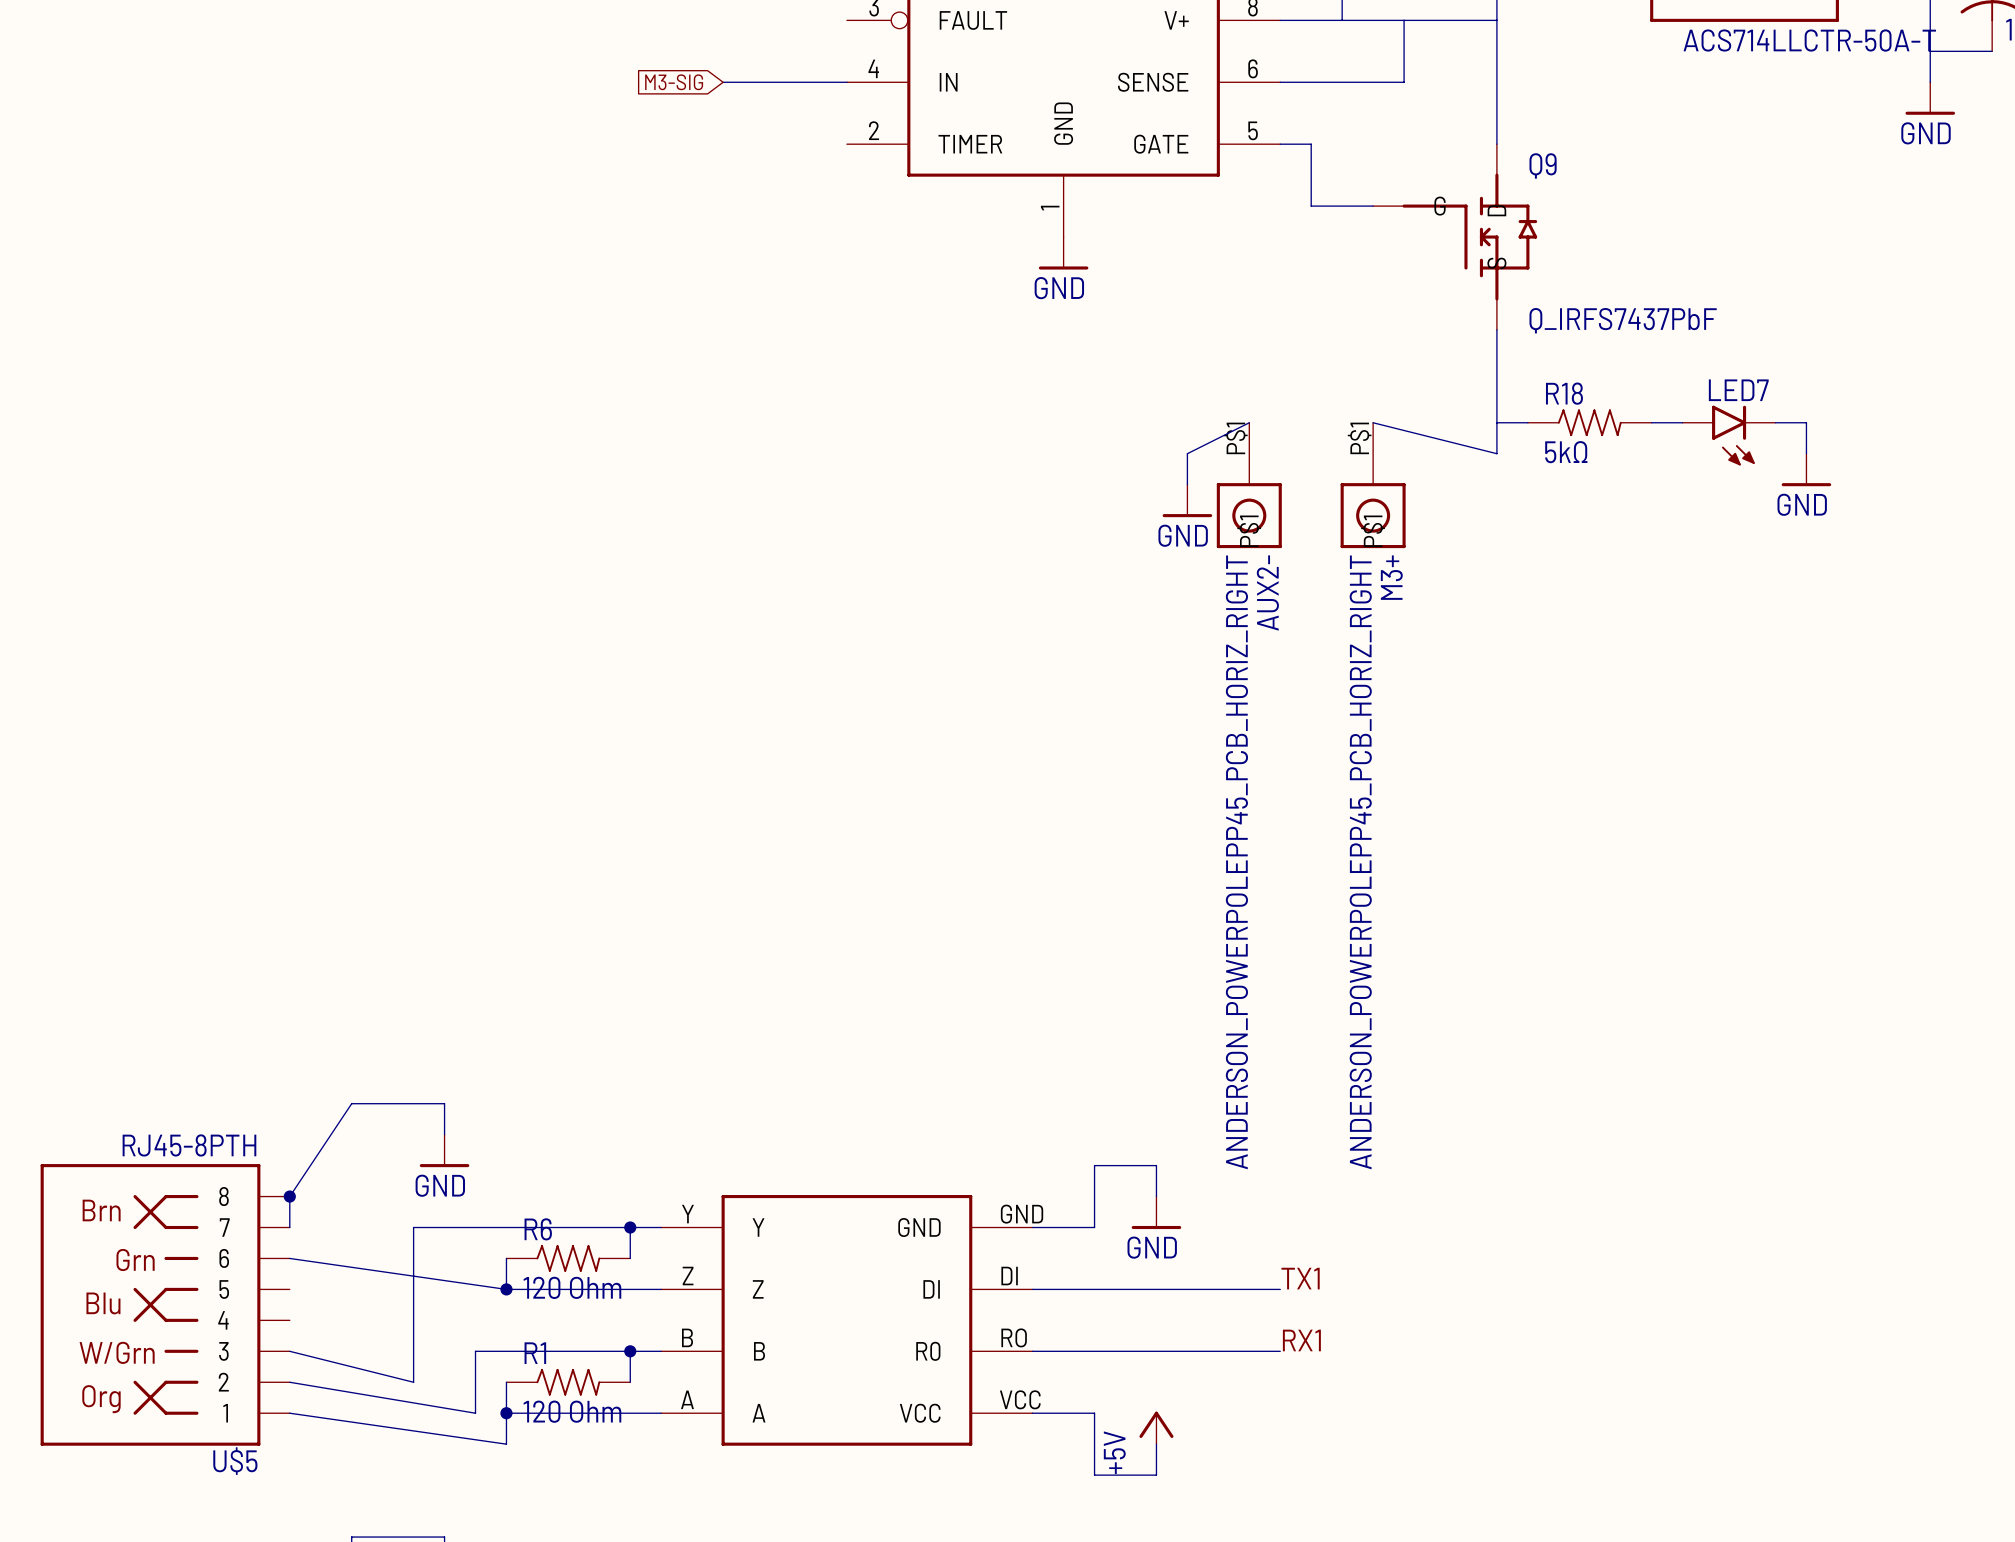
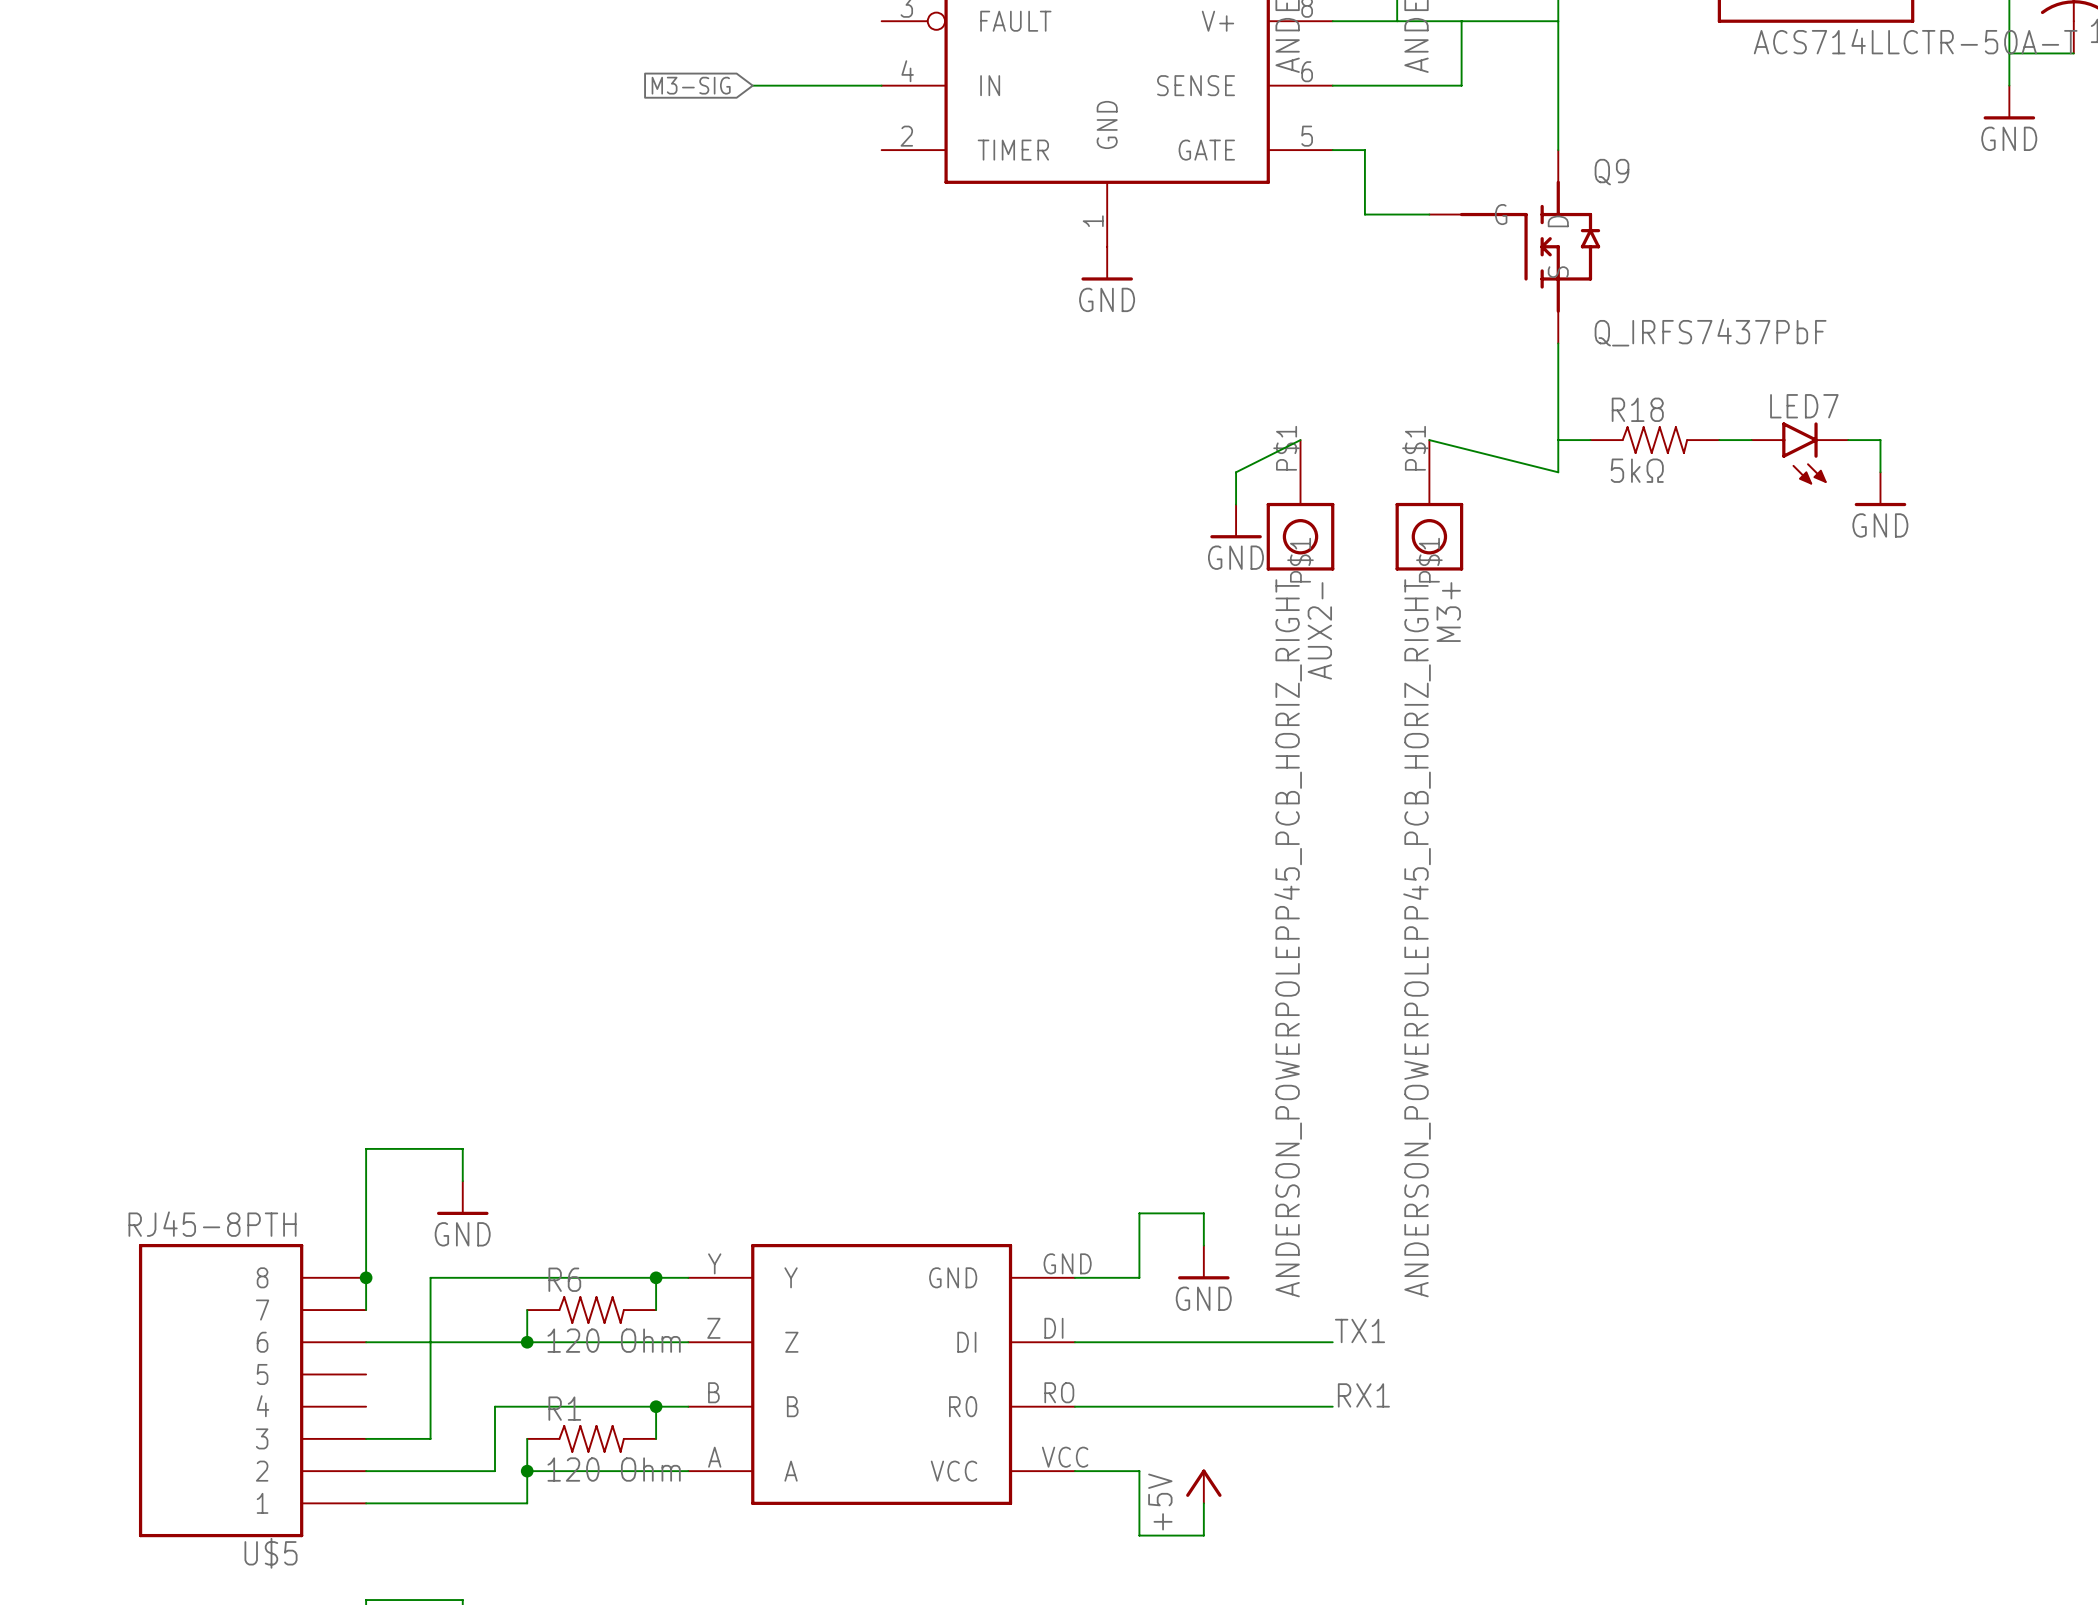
wire: (351, 1103) (289, 1196) (289, 1227) -> (366, 1148) (366, 1310)
U$5 value position: RJ45-8PTH (189, 1145) -> RJ45-8PTH (212, 1224)
U$5 symbol: [40, 1164, 290, 1446] -> [138, 1243, 367, 1538]
junction position: (289, 1196) -> (366, 1277)
wire: (289, 1258) (506, 1289) -> (366, 1342) (527, 1342)
wire: (289, 1351) (413, 1382) -> (366, 1438) (430, 1438)
wire: (289, 1382) (475, 1413) -> (366, 1471) (494, 1471)
wire: (289, 1413) (506, 1444) -> (366, 1503) (527, 1503)
U$5 name position: U$5 (235, 1461) -> U$5 (271, 1553)

